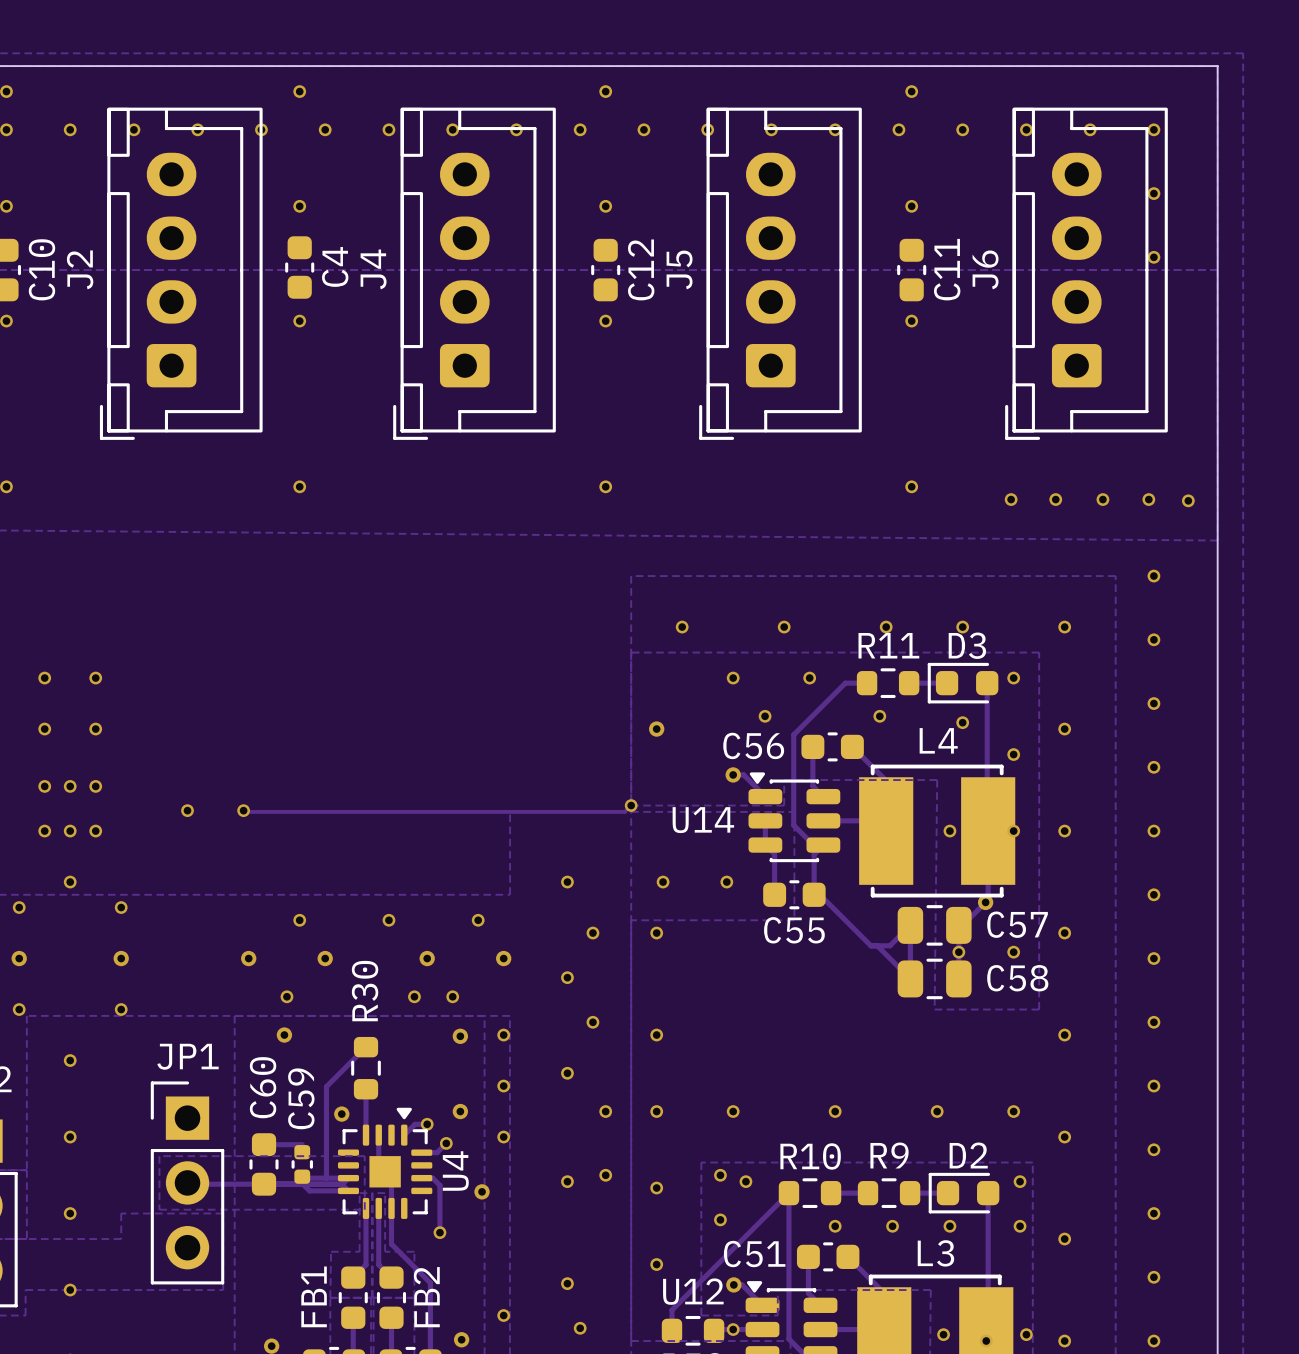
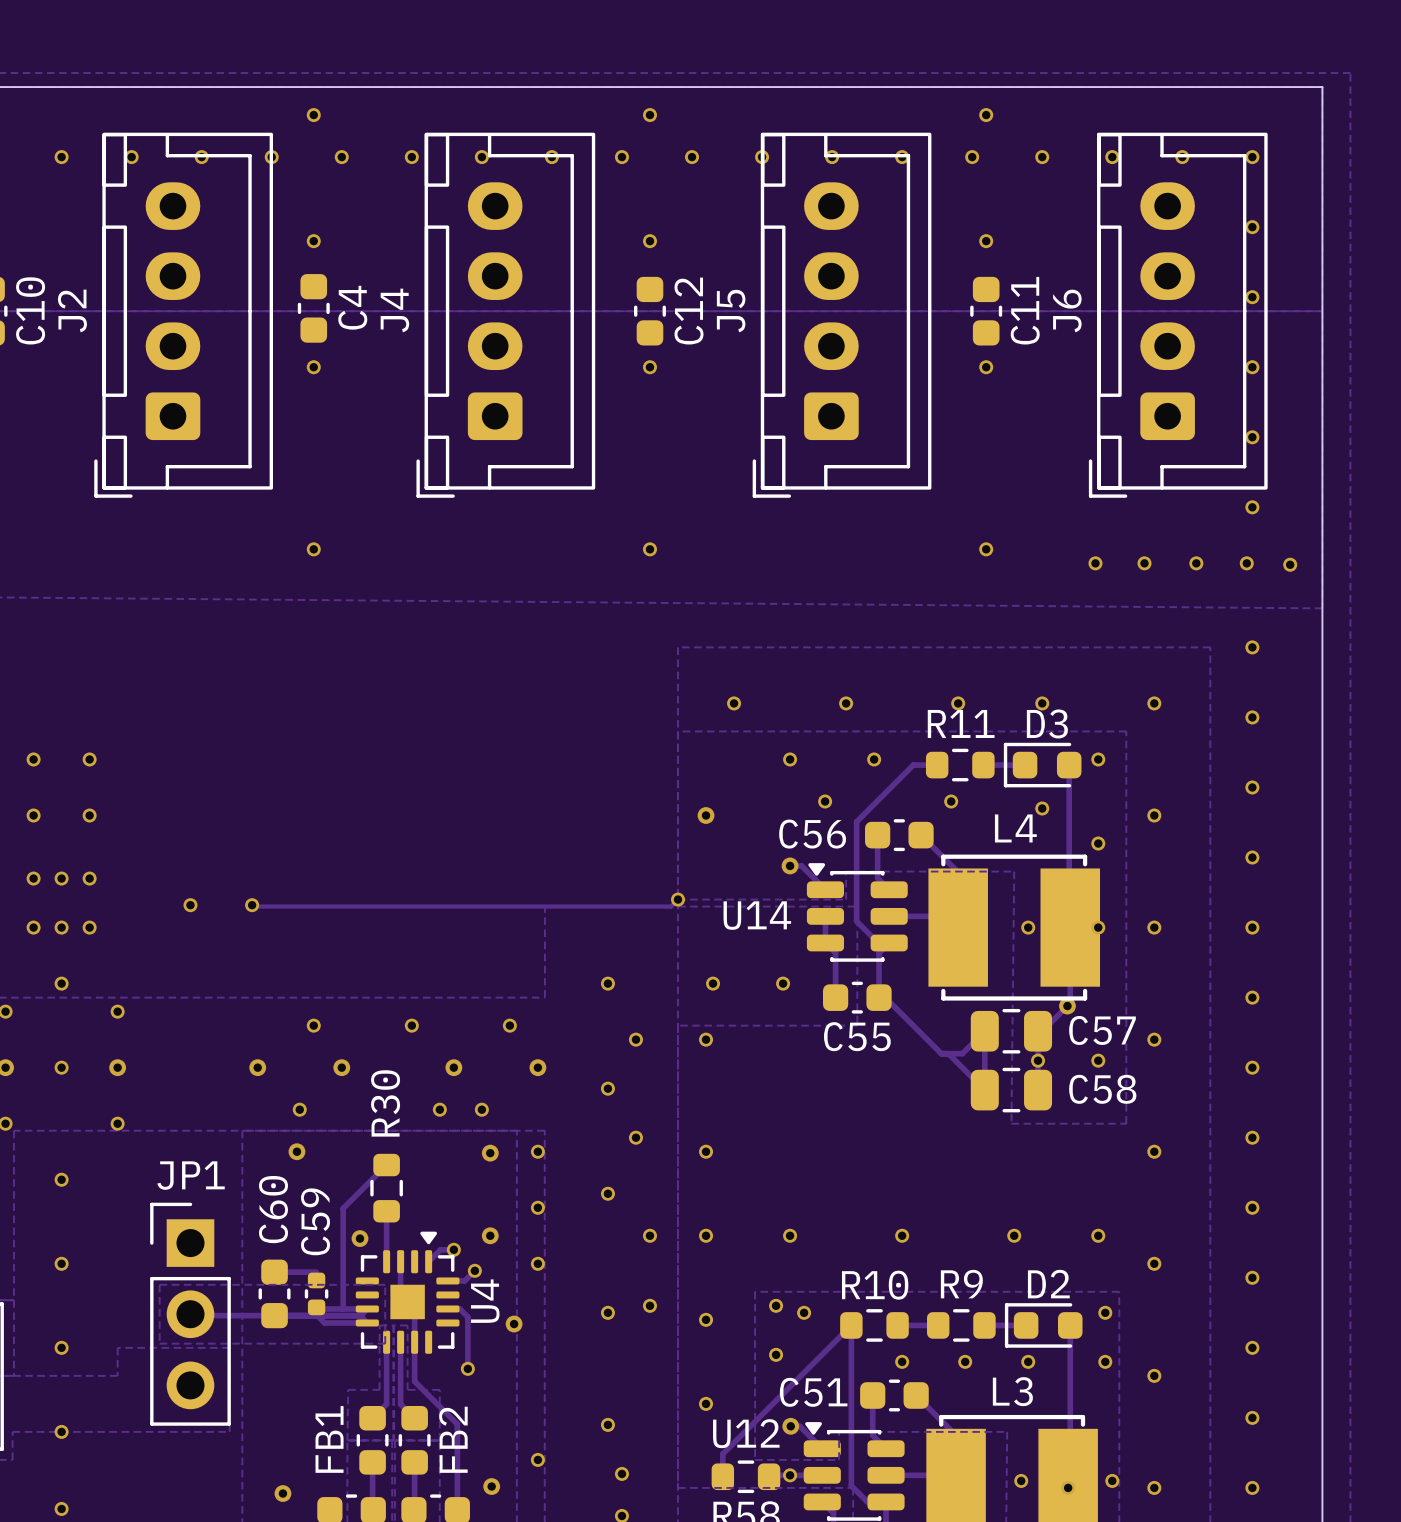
via: none -> (1252, 367)
via: none -> (1252, 437)
via: none -> (1252, 507)
via: none -> (61, 1067)

